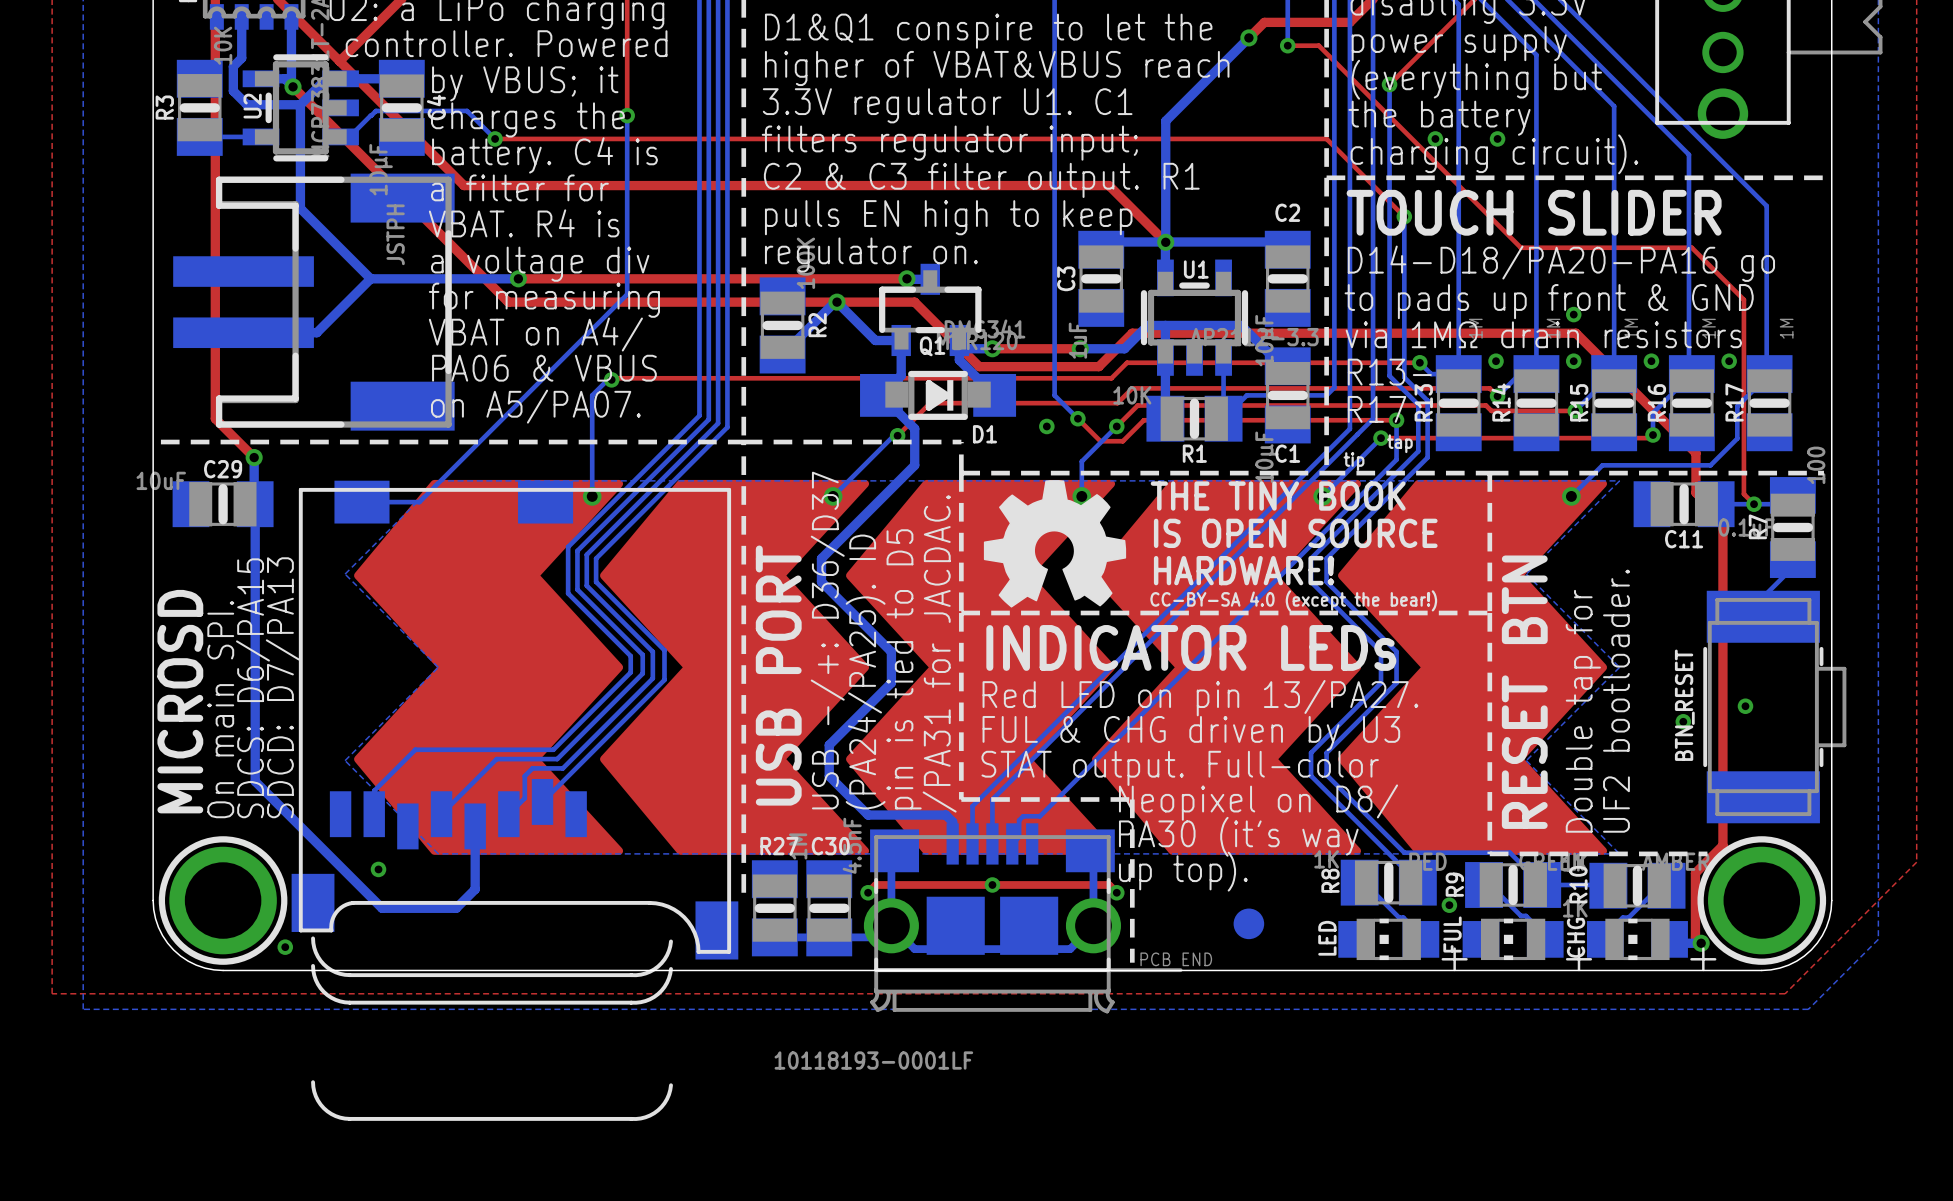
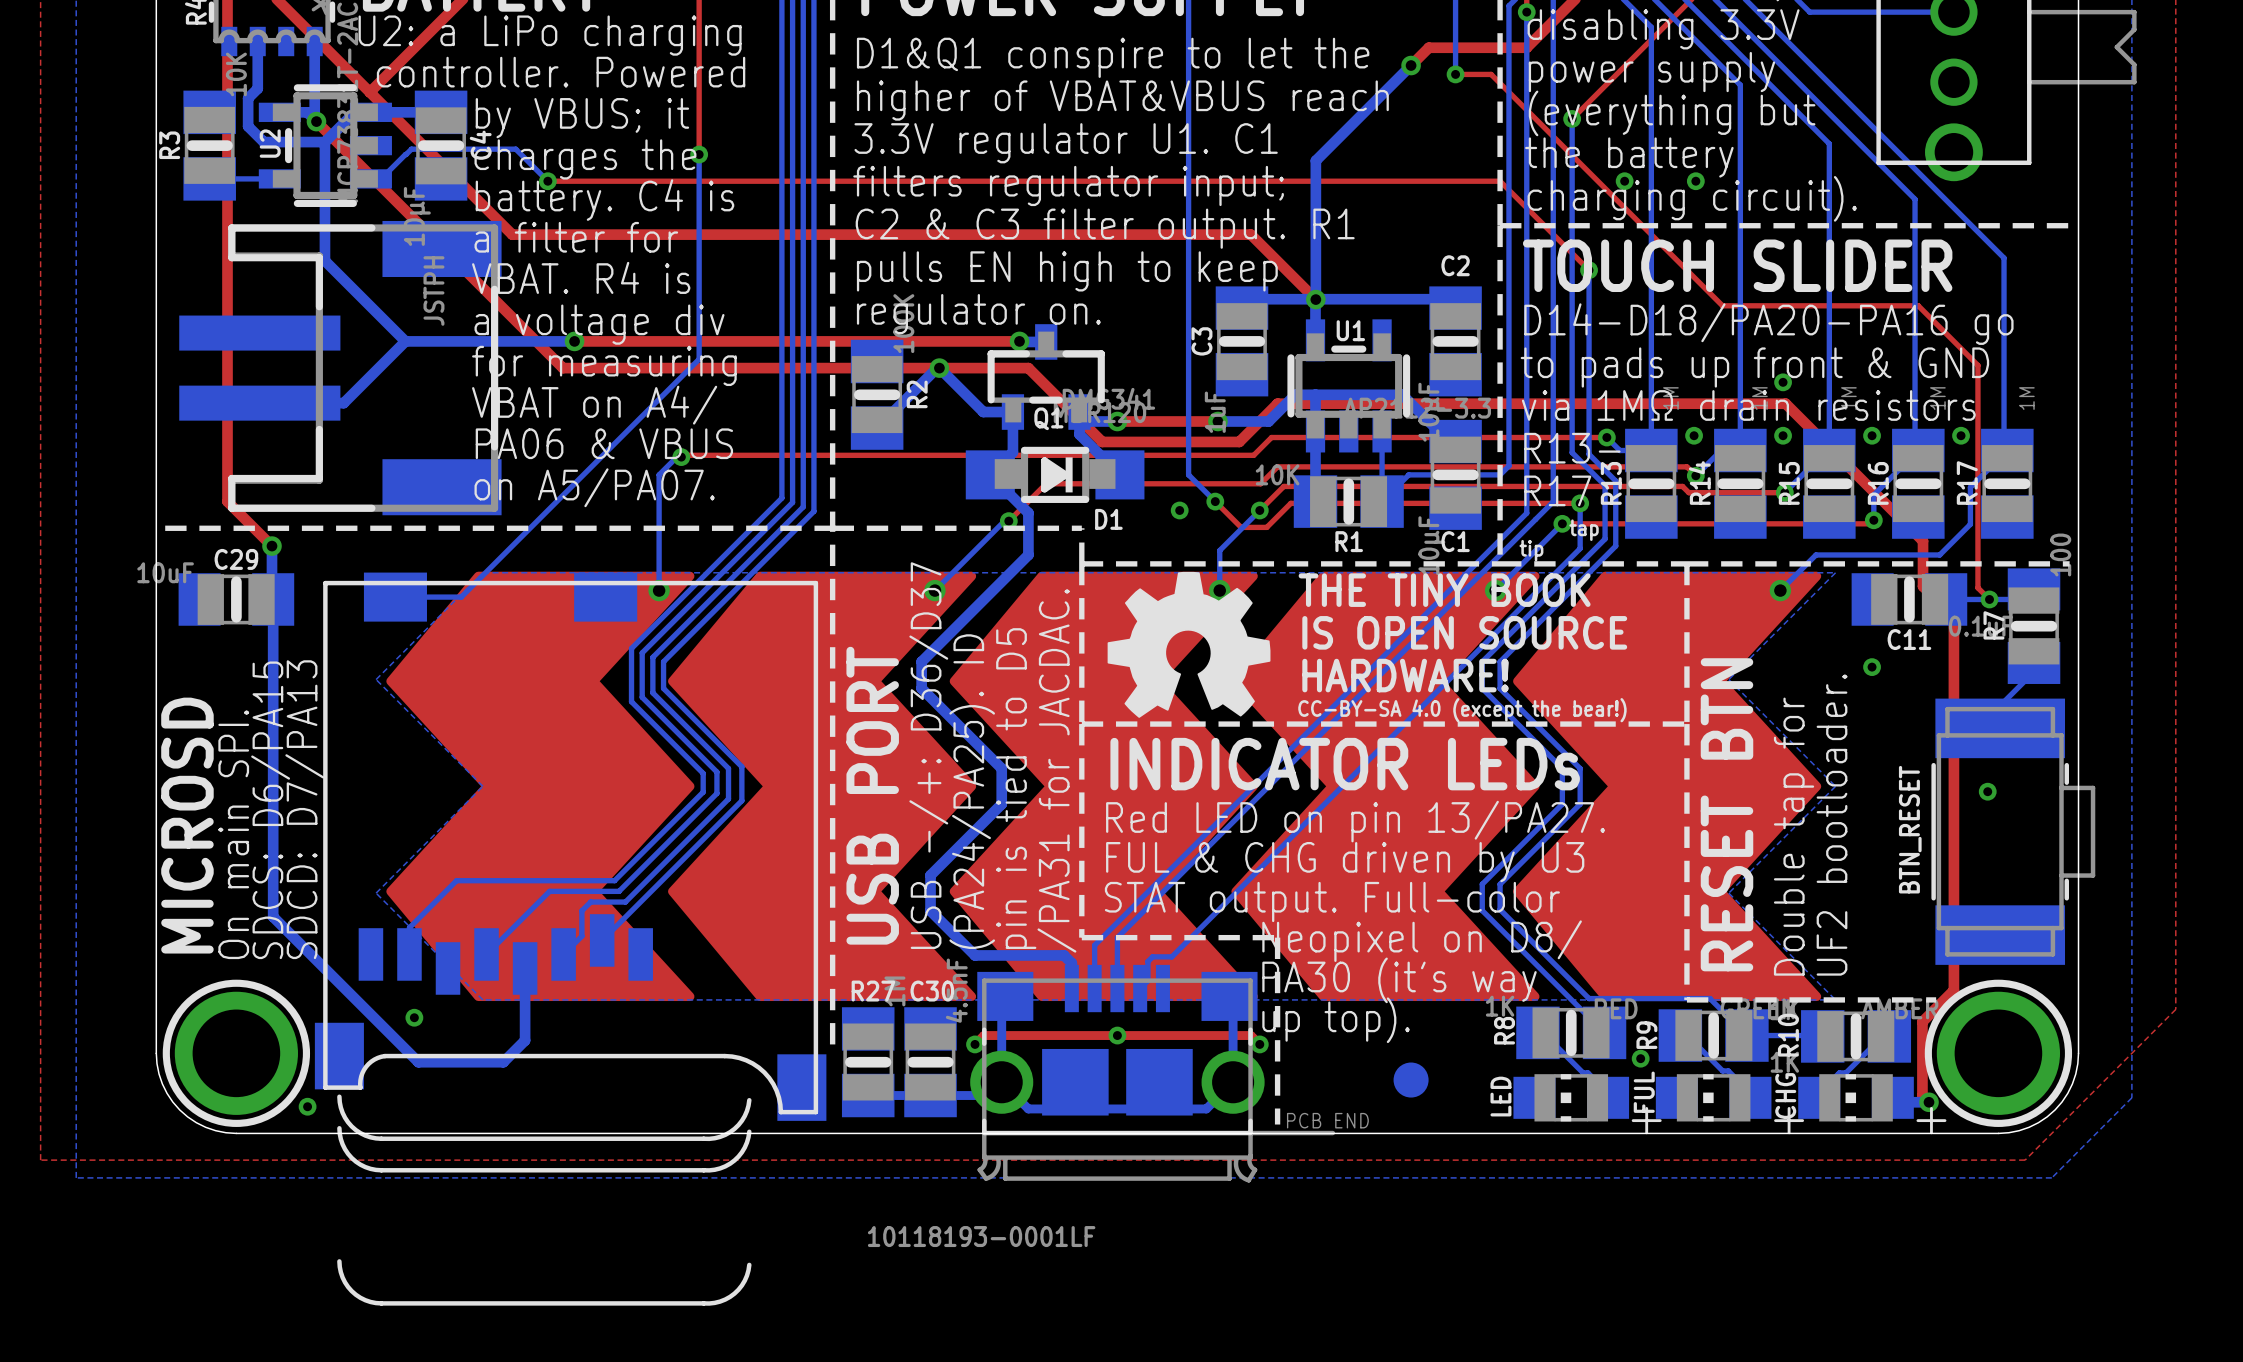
via: none -> (1872, 667)
via position: (1745, 706) -> (1987, 791)
via: (1683, 721) -> none

